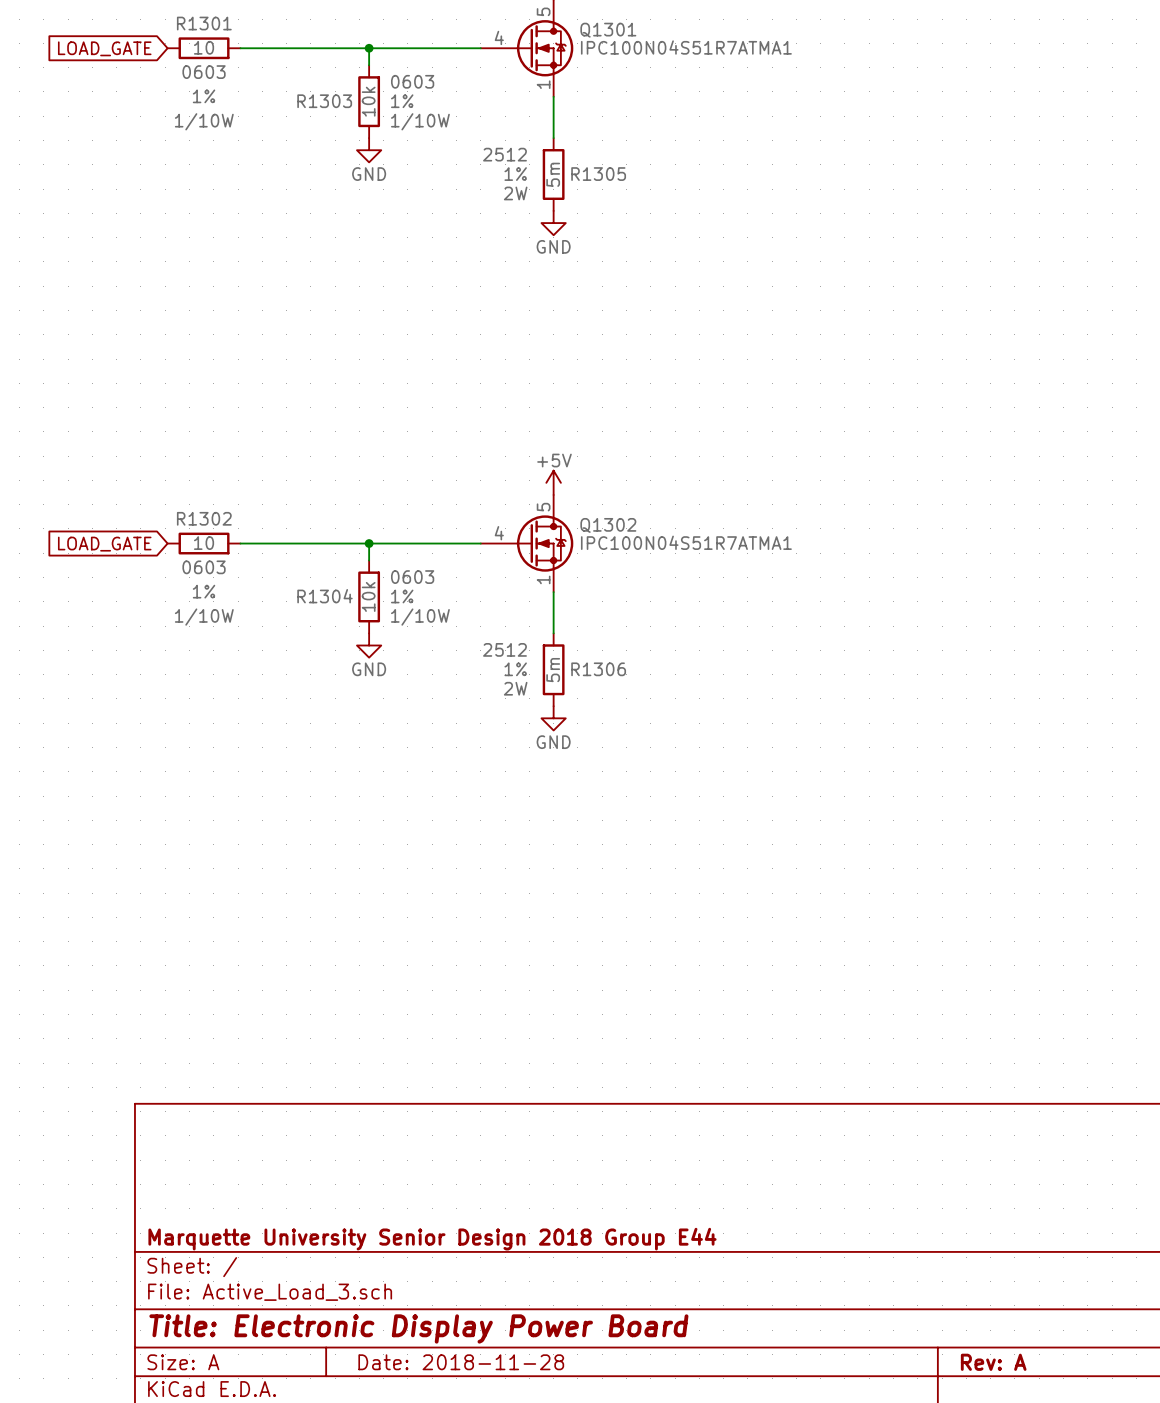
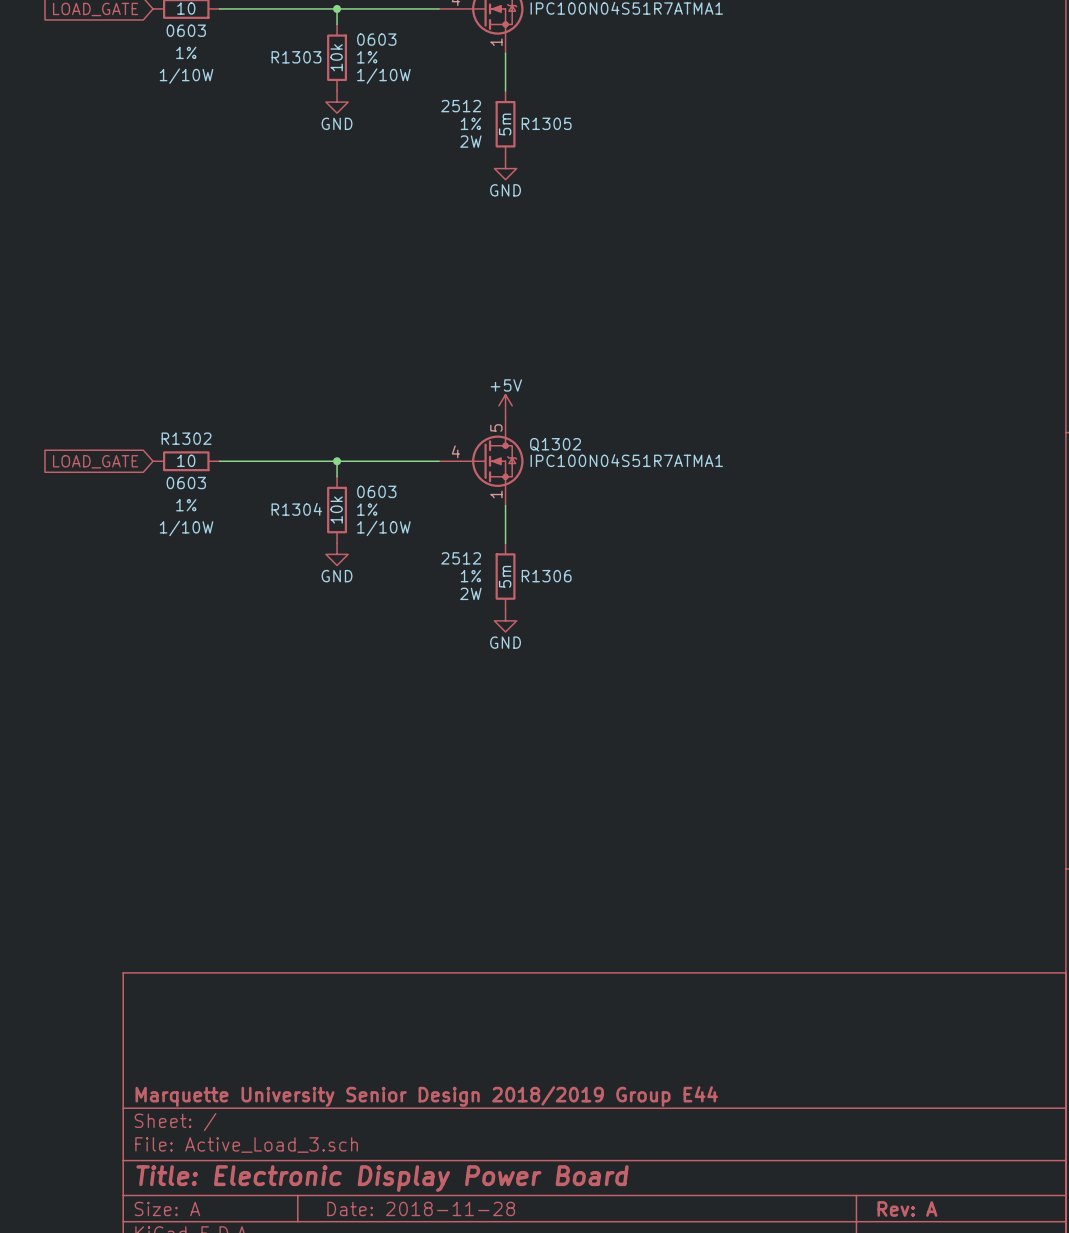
title block: Marquette University Senior Design 2018 Group E44 (432, 1239) -> Marquette University Senior Design 2018/2019 Group E44 (426, 1096)

